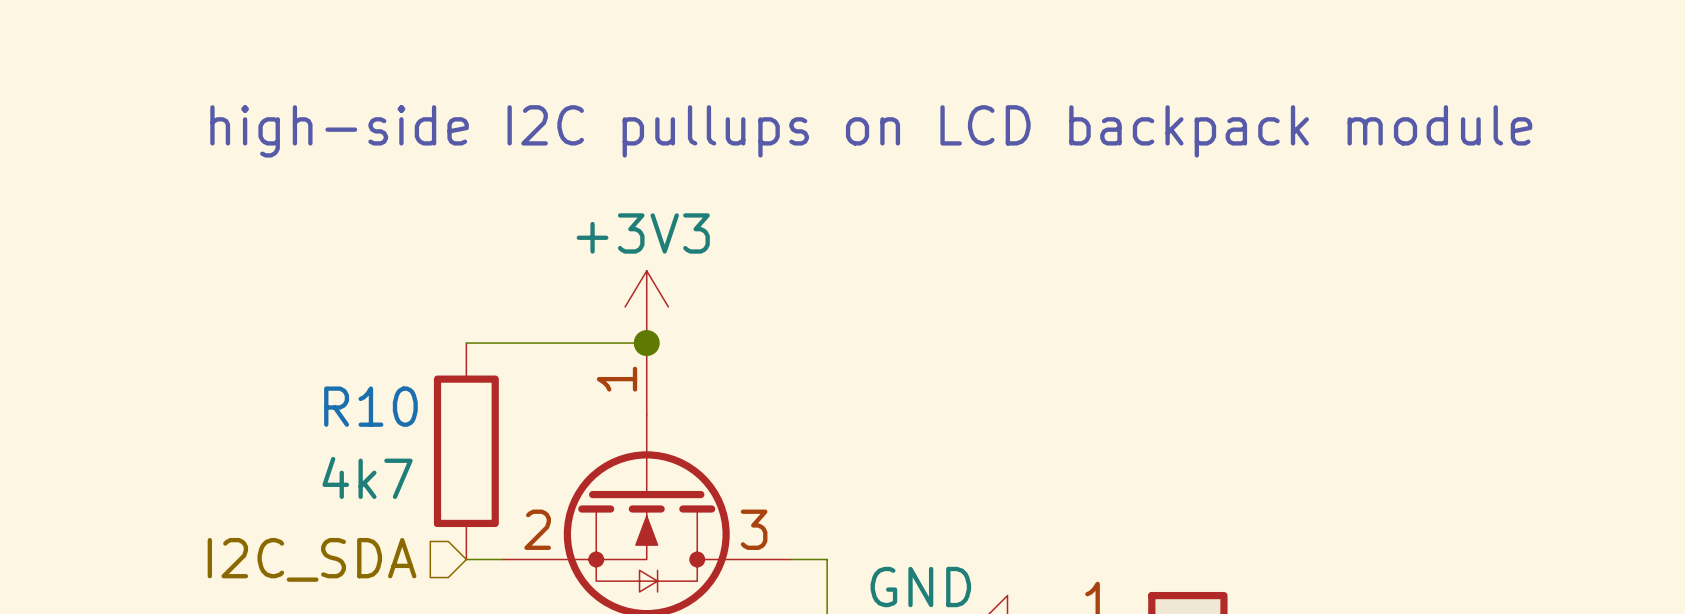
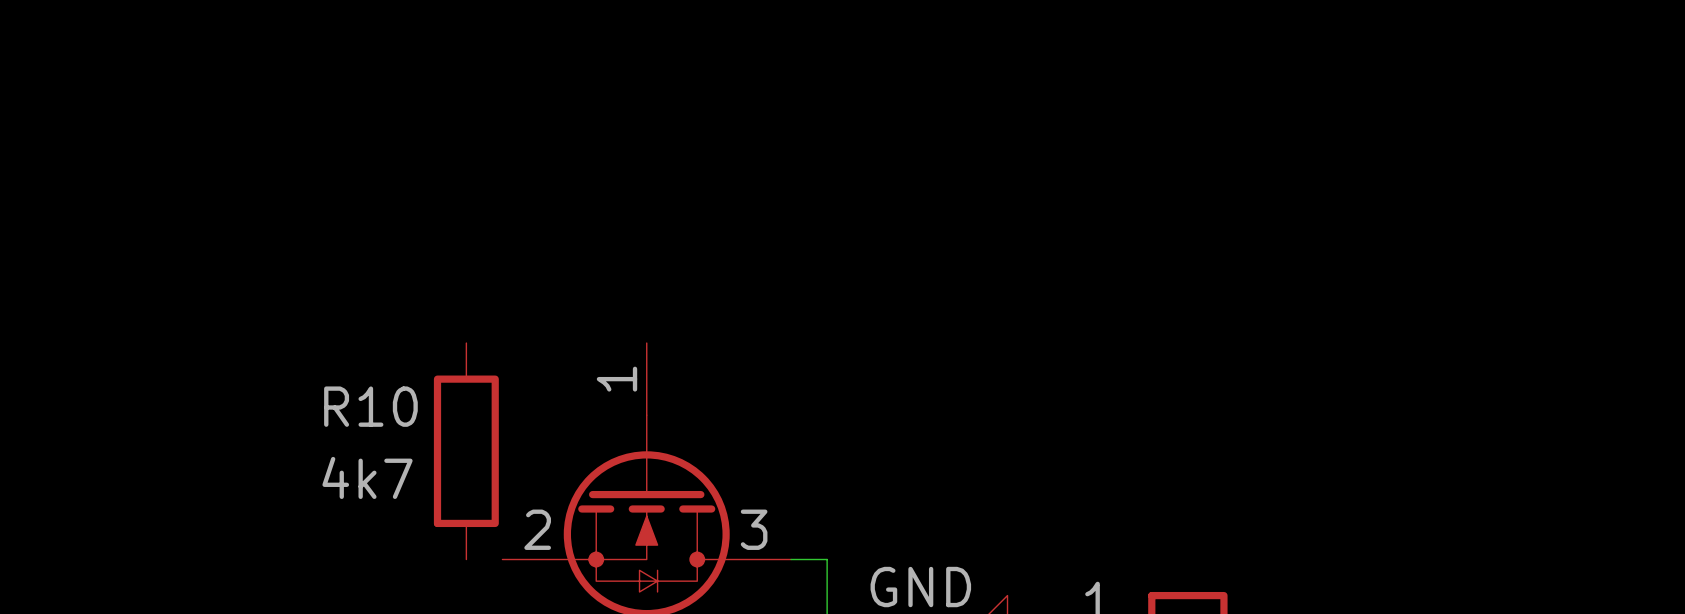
text: high-side I2C pullups on LCD backpack module (871, 131) -> none
power symbol: +3V3 (646, 306) -> none
wire: (466, 343) (646, 343) -> none
junction: (646, 343) -> none
hierarchical label: I2C_SDA (312, 559) -> none
wire: (466, 559) (502, 559) -> none

